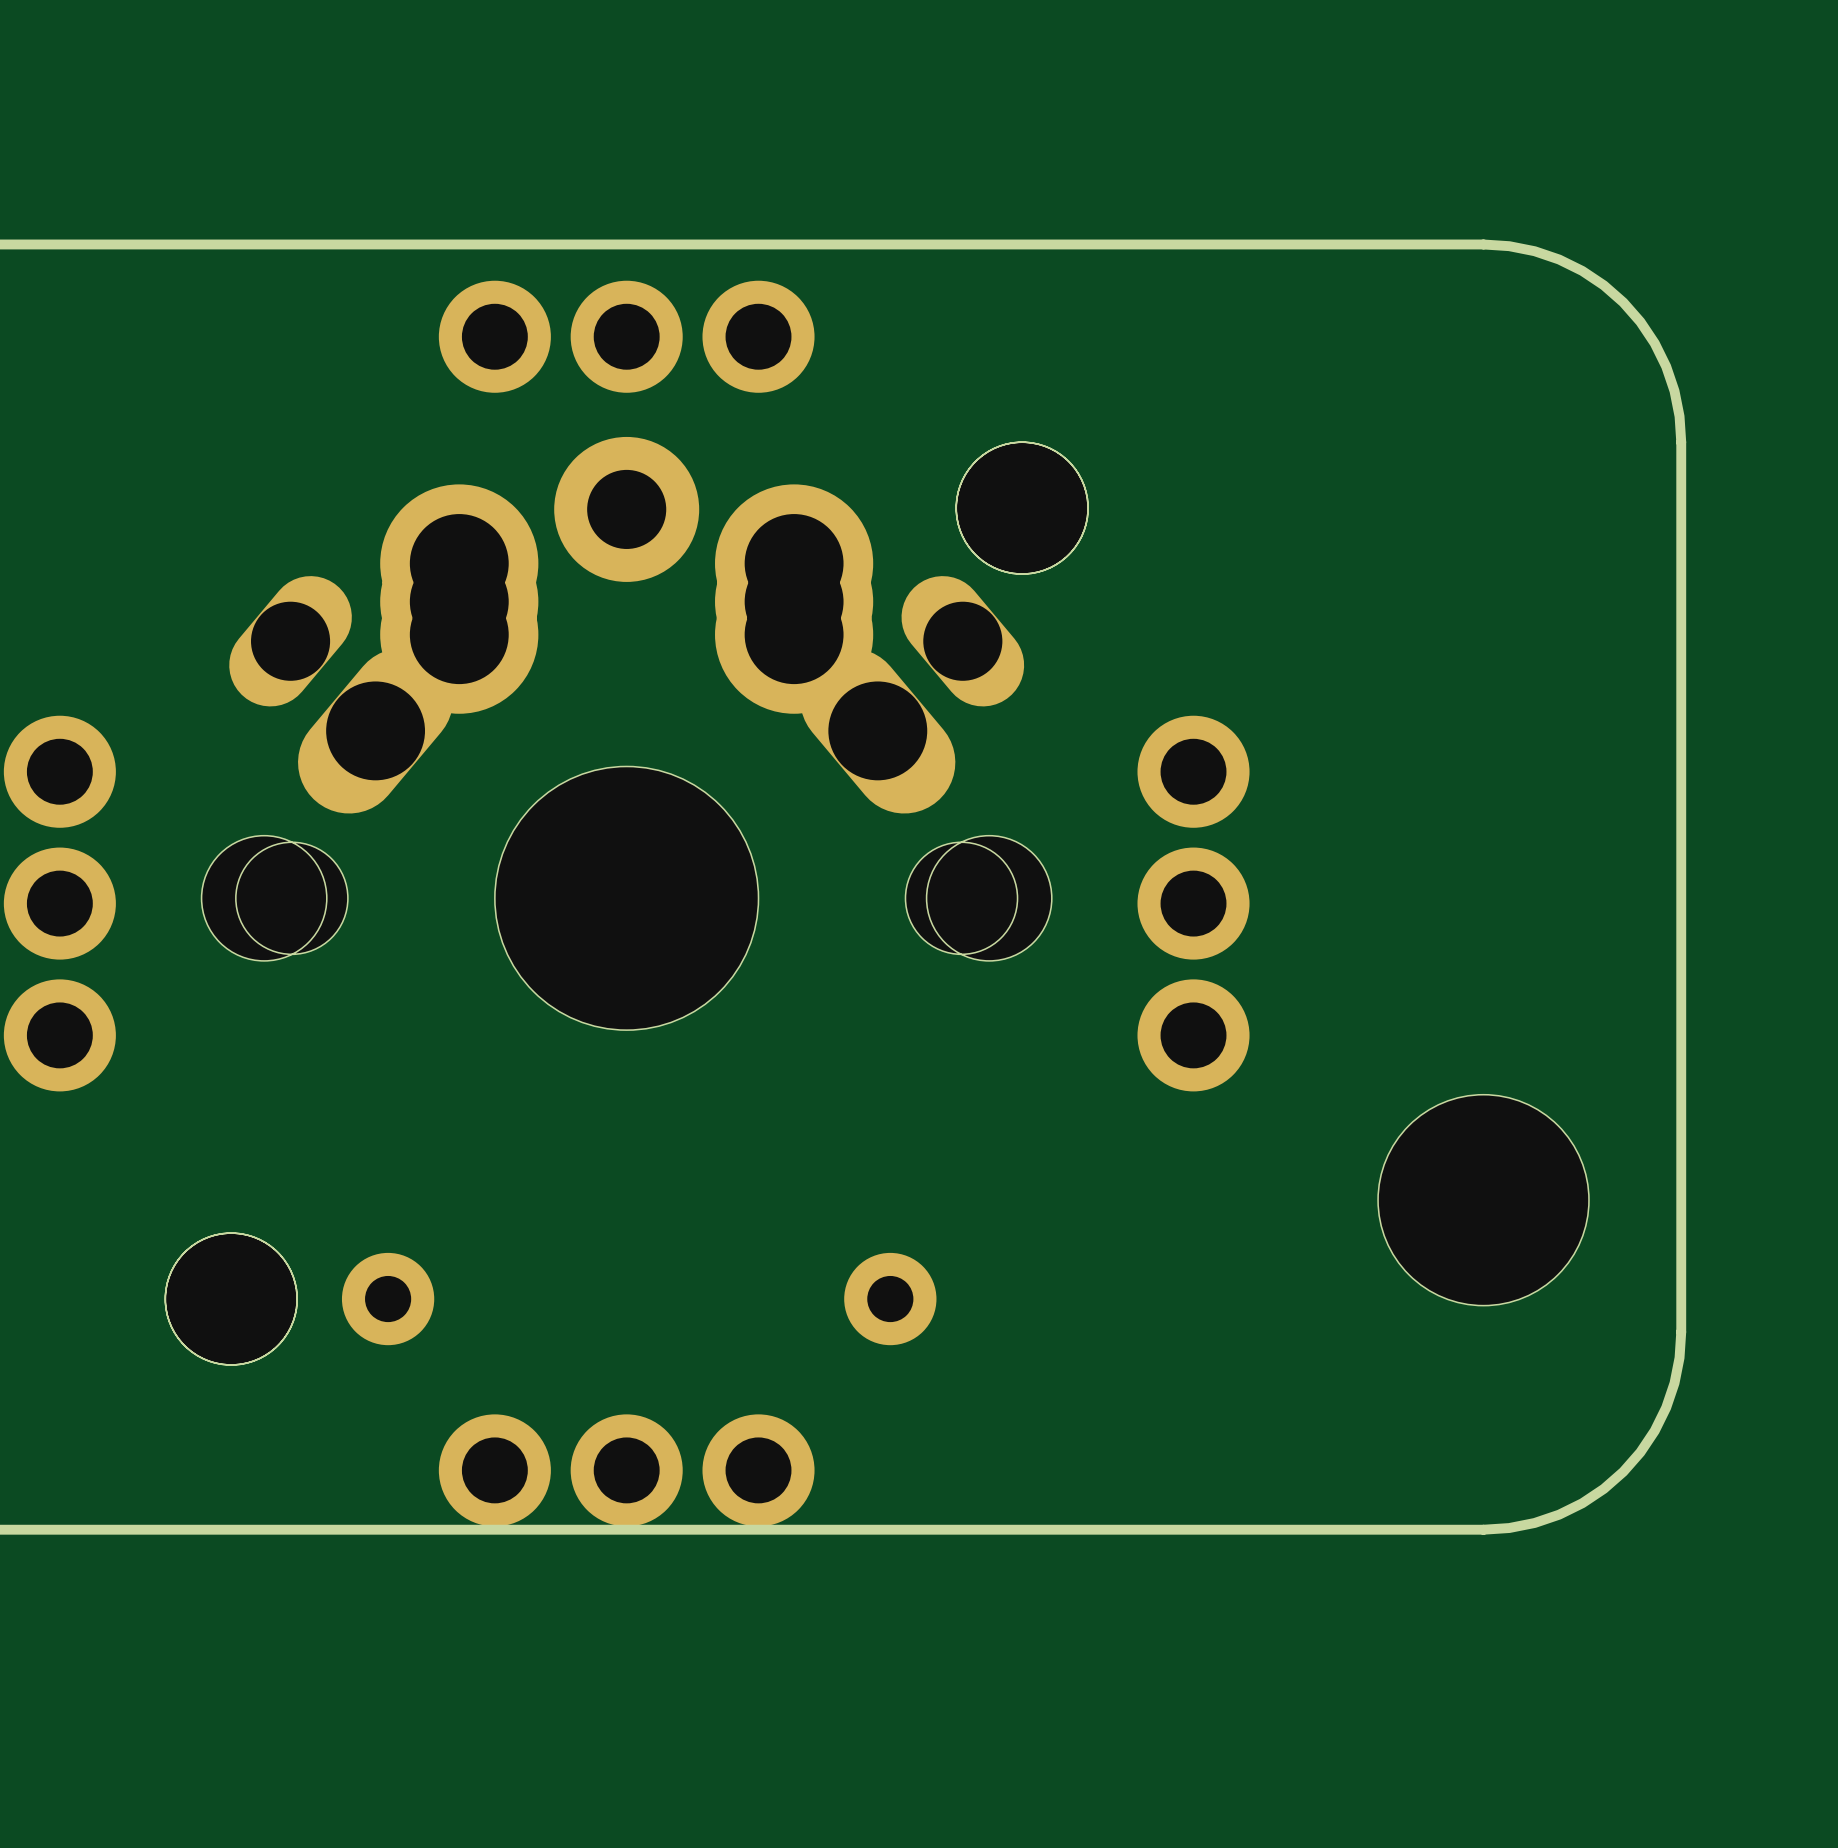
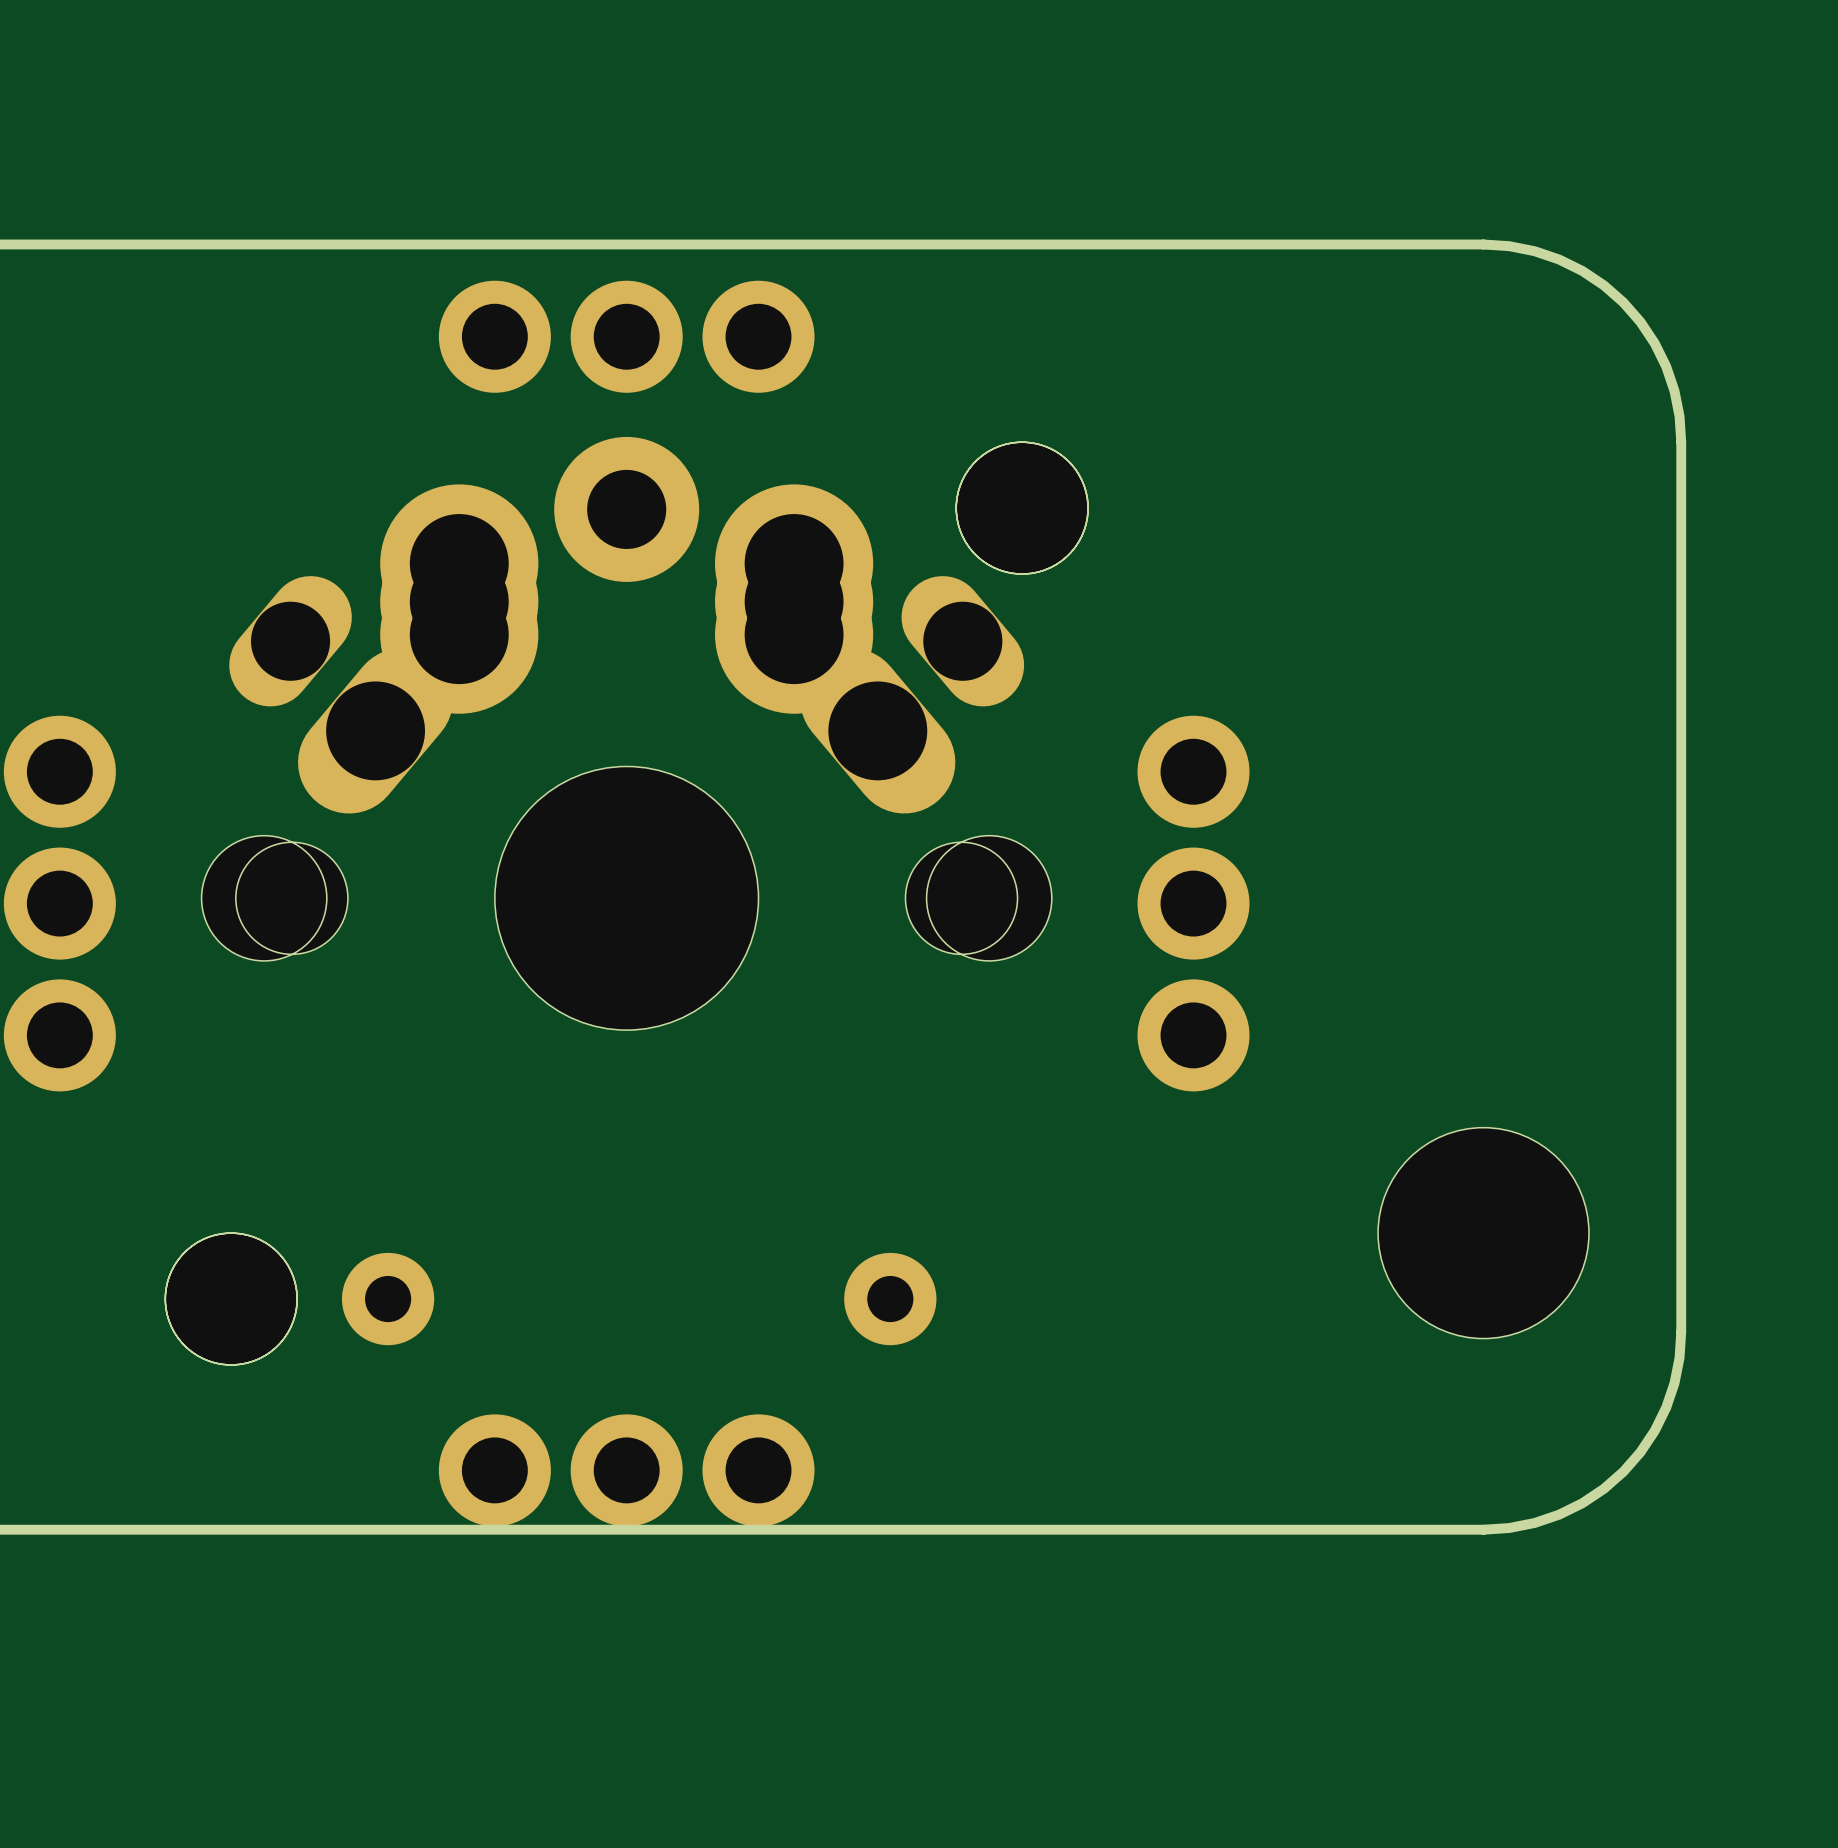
part position: (1483, 1200) -> (1483, 1233)

